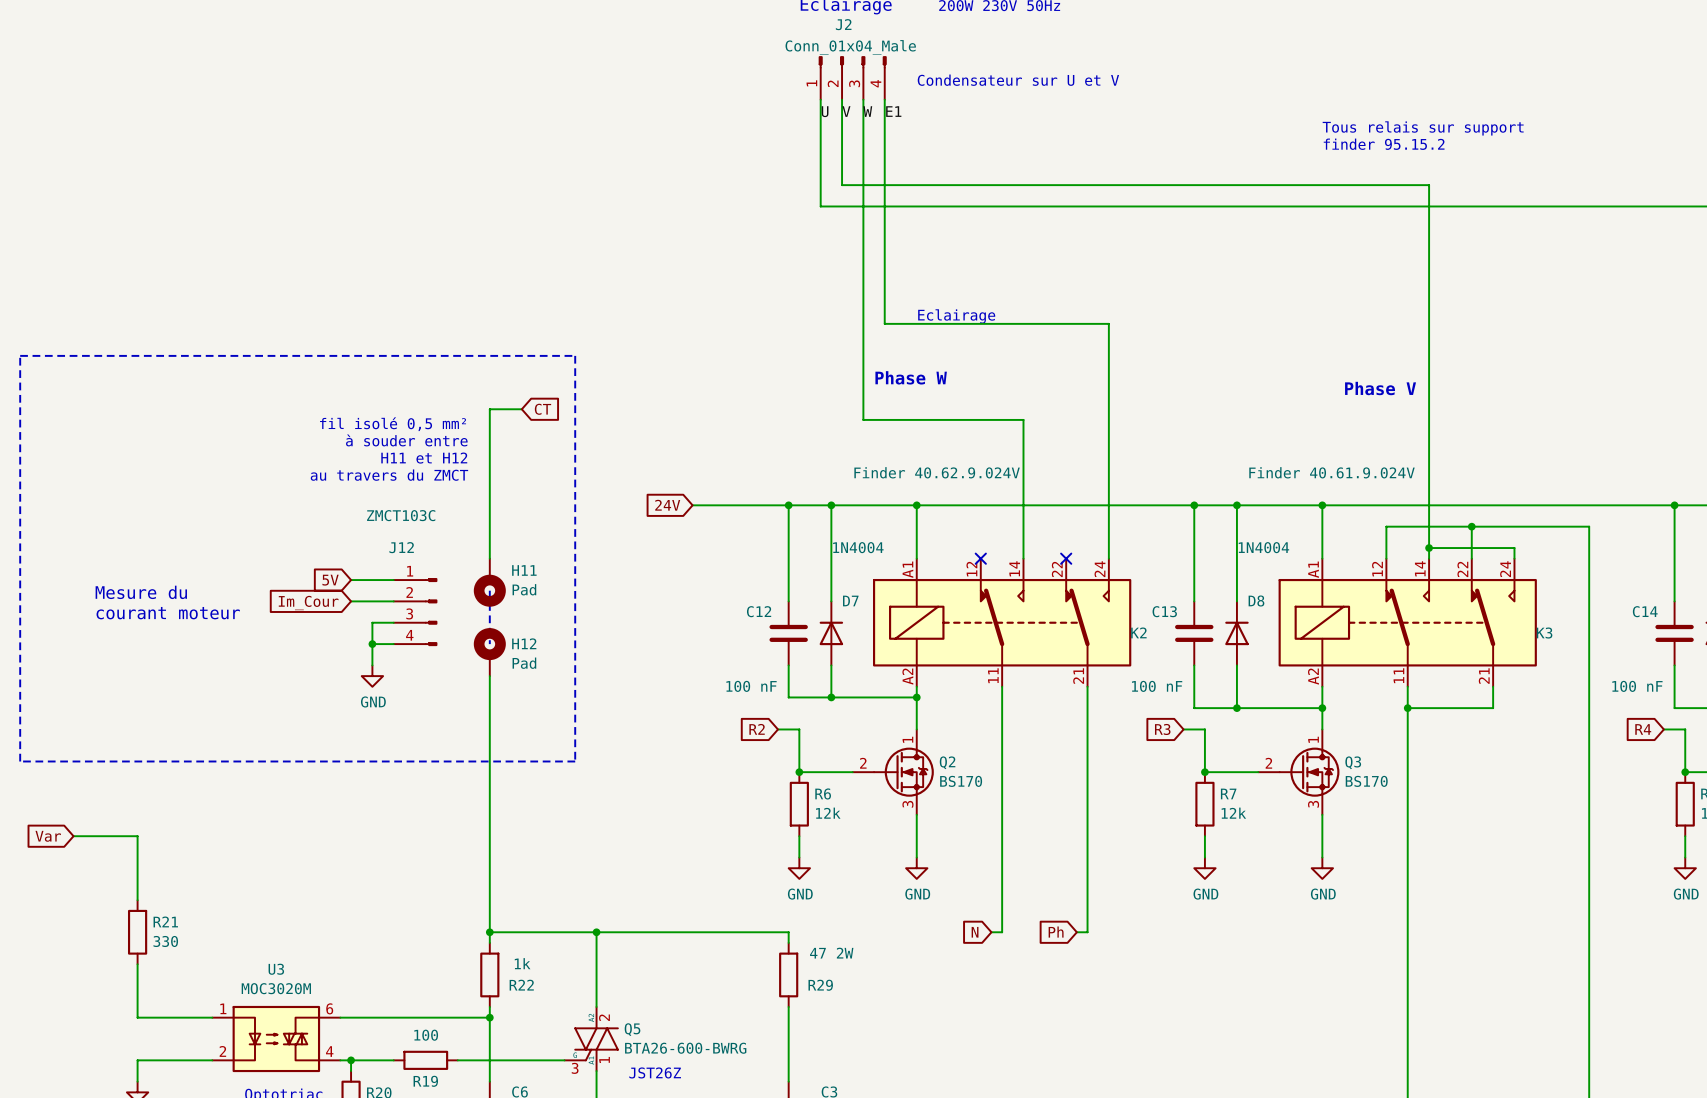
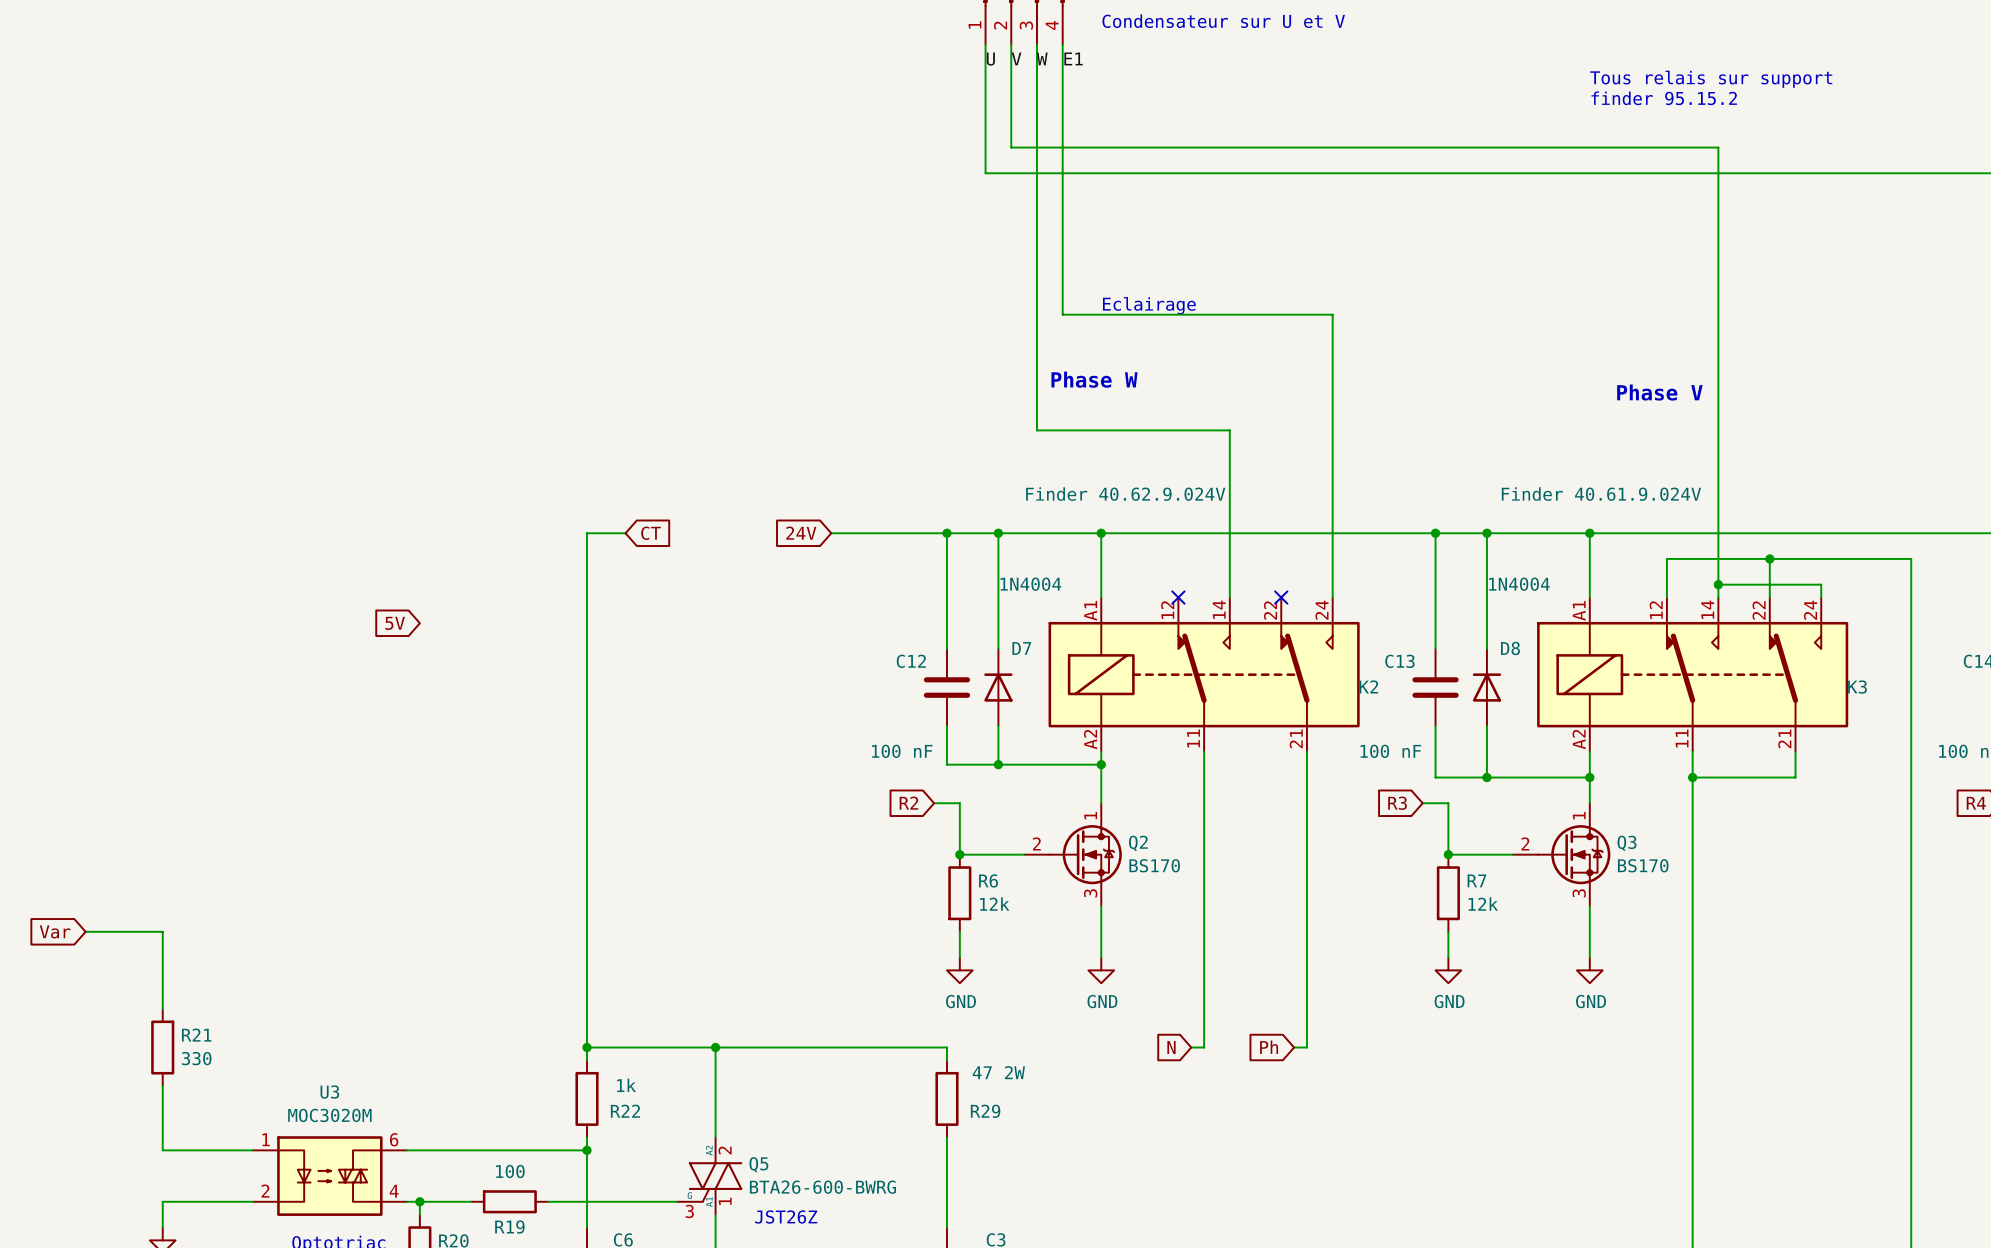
line: (20, 355) (575, 355) (575, 761) (20, 761) (20, 355) -> none
wire: (521, 409) (489, 409) (489, 505) -> (625, 533) (587, 533)
global label position: CT (542, 409) -> CT (651, 533)
text: fil isolé 0,5 mm² (393, 424) -> none
text: à souder entre (406, 440) -> none
text: H11 et H12 (424, 458) -> none
text: au travers du ZMCT (389, 475) -> none
wire: (351, 580) (393, 580) -> none
H11: Pad (489, 582) -> none
line: (489, 590) (489, 644) -> none
text: Mesure du (141, 592) -> none
wire: (351, 601) (393, 601) -> none
global label: Im_Cour (308, 603) -> none
J12: ZMCT103C (415, 612) -> none
text: courant moteur (168, 613) -> none
wire: (393, 622) (372, 622) (372, 665) -> none
wire: (372, 644) (393, 644) -> none
junction: (372, 644) -> none
H12: Pad (489, 652) -> none
power symbol: GND (372, 676) -> none

